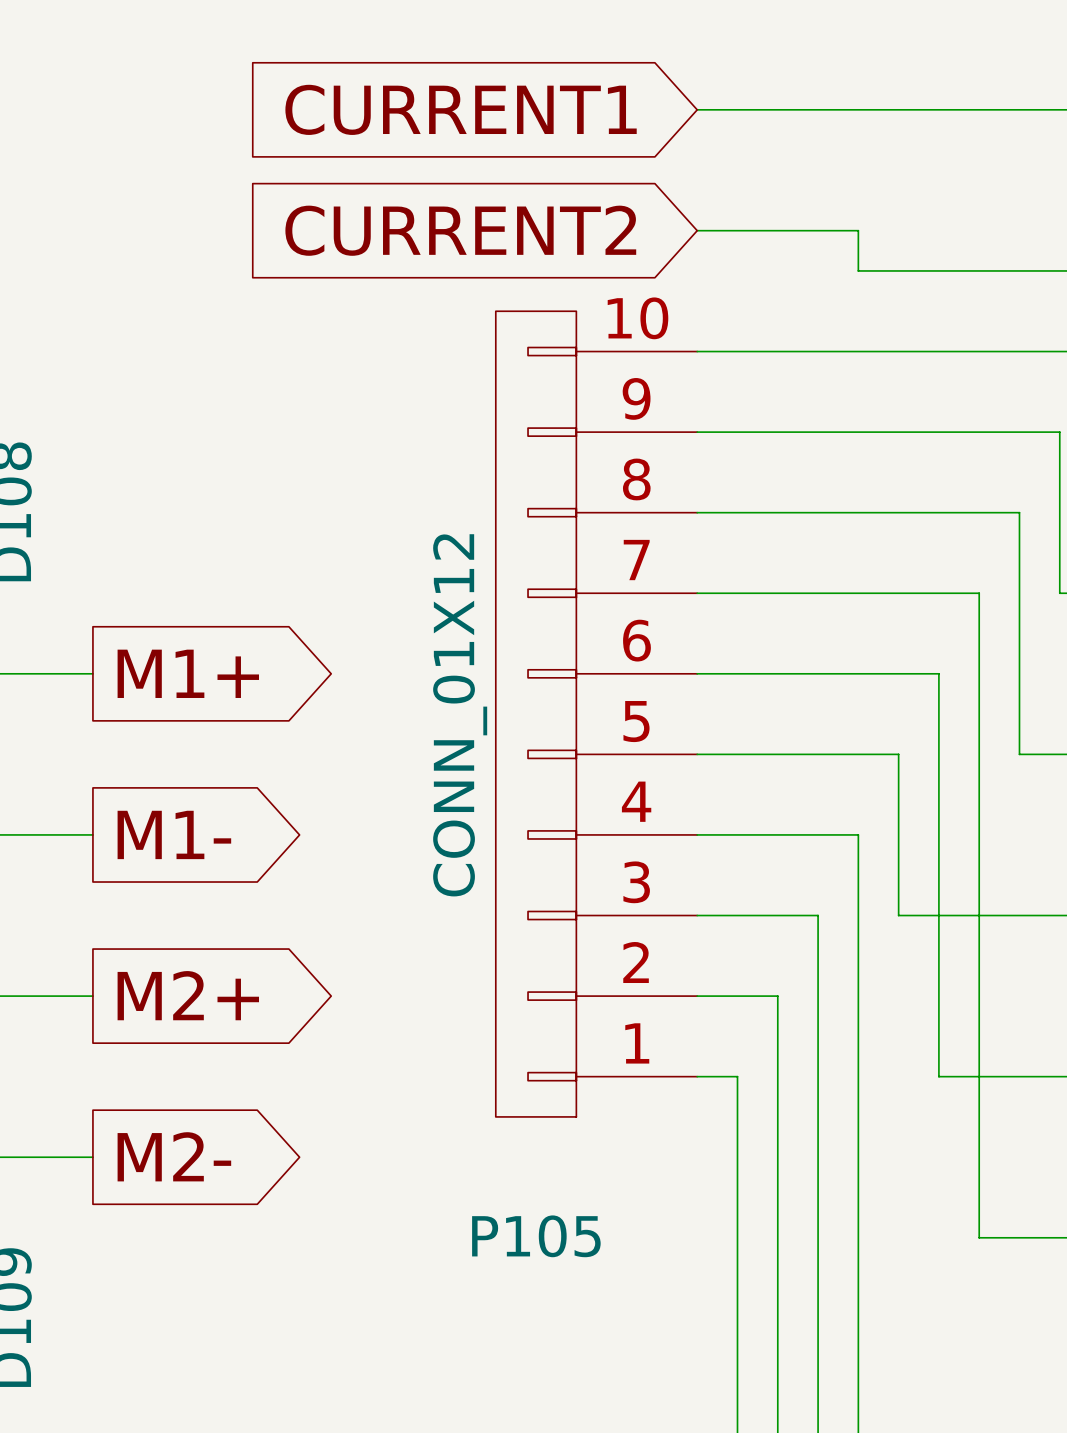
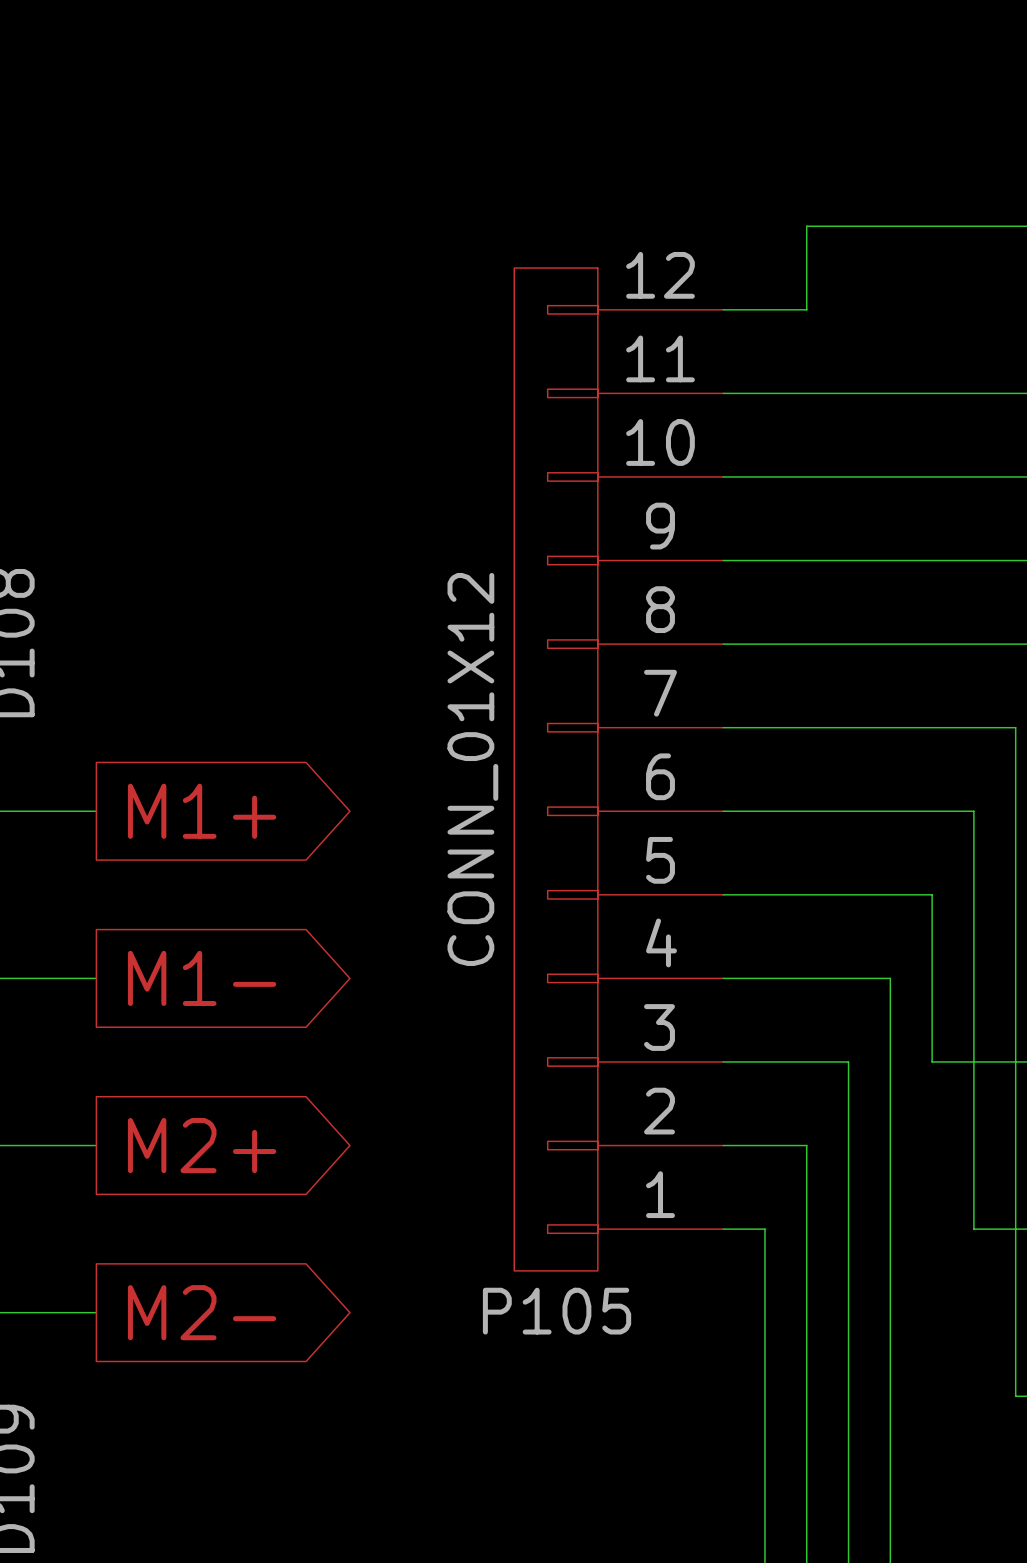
global label: CURRENT1 (461, 109) -> none
wire: (697, 109) (777, 109) -> (723, 309) (806, 309) (806, 226)
global label: CURRENT2 (460, 230) -> none
wire: (697, 230) (858, 230) (858, 270) -> (723, 393) (890, 393)
P105 symbol: [495, 311, 698, 1117] -> [514, 268, 724, 1271]

